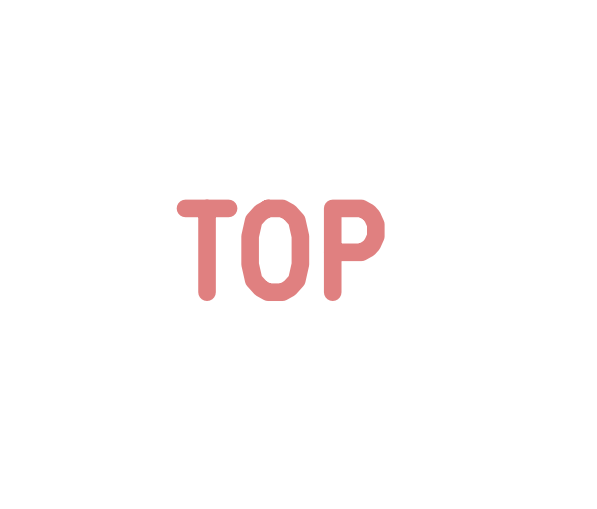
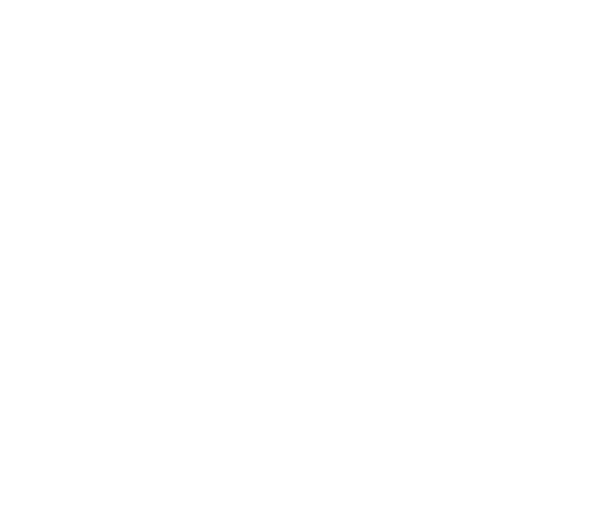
text: TOP (280, 250) -> none

